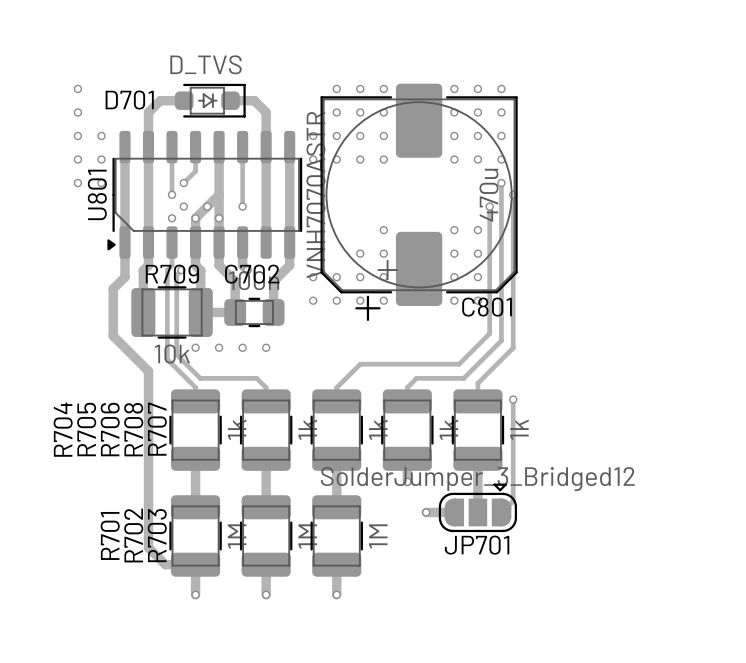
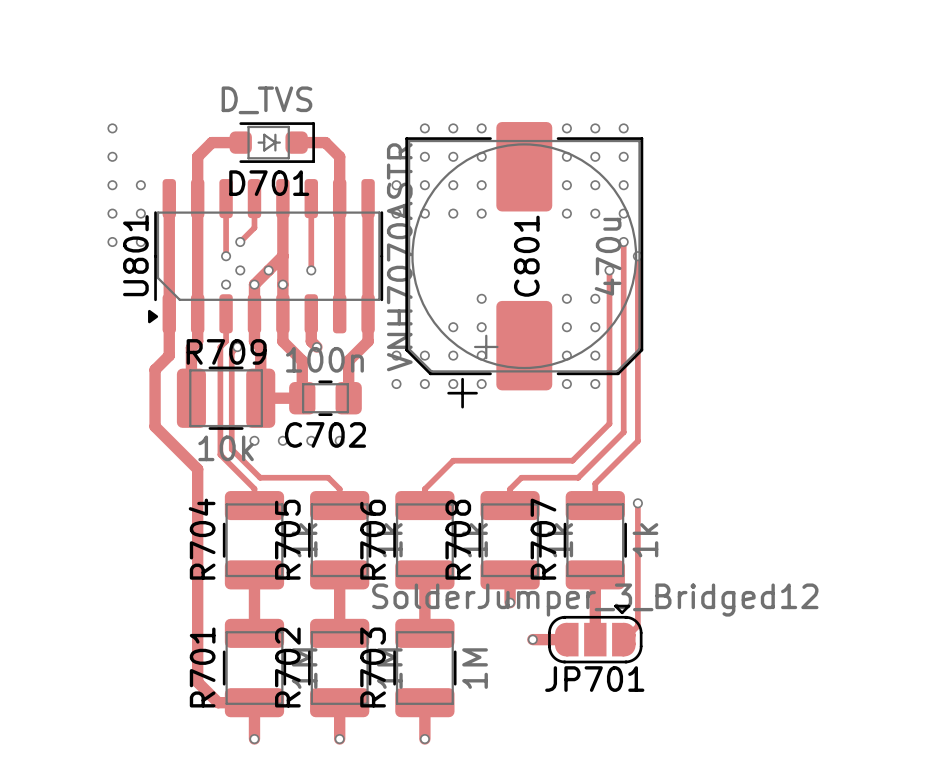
D701 name position: D701 (129, 100) -> D701 (269, 183)
C702 name position: C702 (252, 274) -> C702 (325, 434)
C801 name rotation: 0° (487, 307) -> 90° counterclockwise (526, 256)
C801 name position: C801 (487, 307) -> C801 (526, 256)
R704 name position: R704 (63, 429) -> R704 (202, 539)
R705 name position: R705 (86, 429) -> R705 (287, 539)
R706 name position: R706 (110, 429) -> R706 (373, 539)
R708 name position: R708 (133, 429) -> R708 (458, 539)
R707 name position: R707 (157, 429) -> R707 (543, 539)
R701 name position: R701 (110, 535) -> R701 (202, 667)
R702 name position: R702 (133, 535) -> R702 (287, 667)
R703 name position: R703 (157, 535) -> R703 (373, 667)

